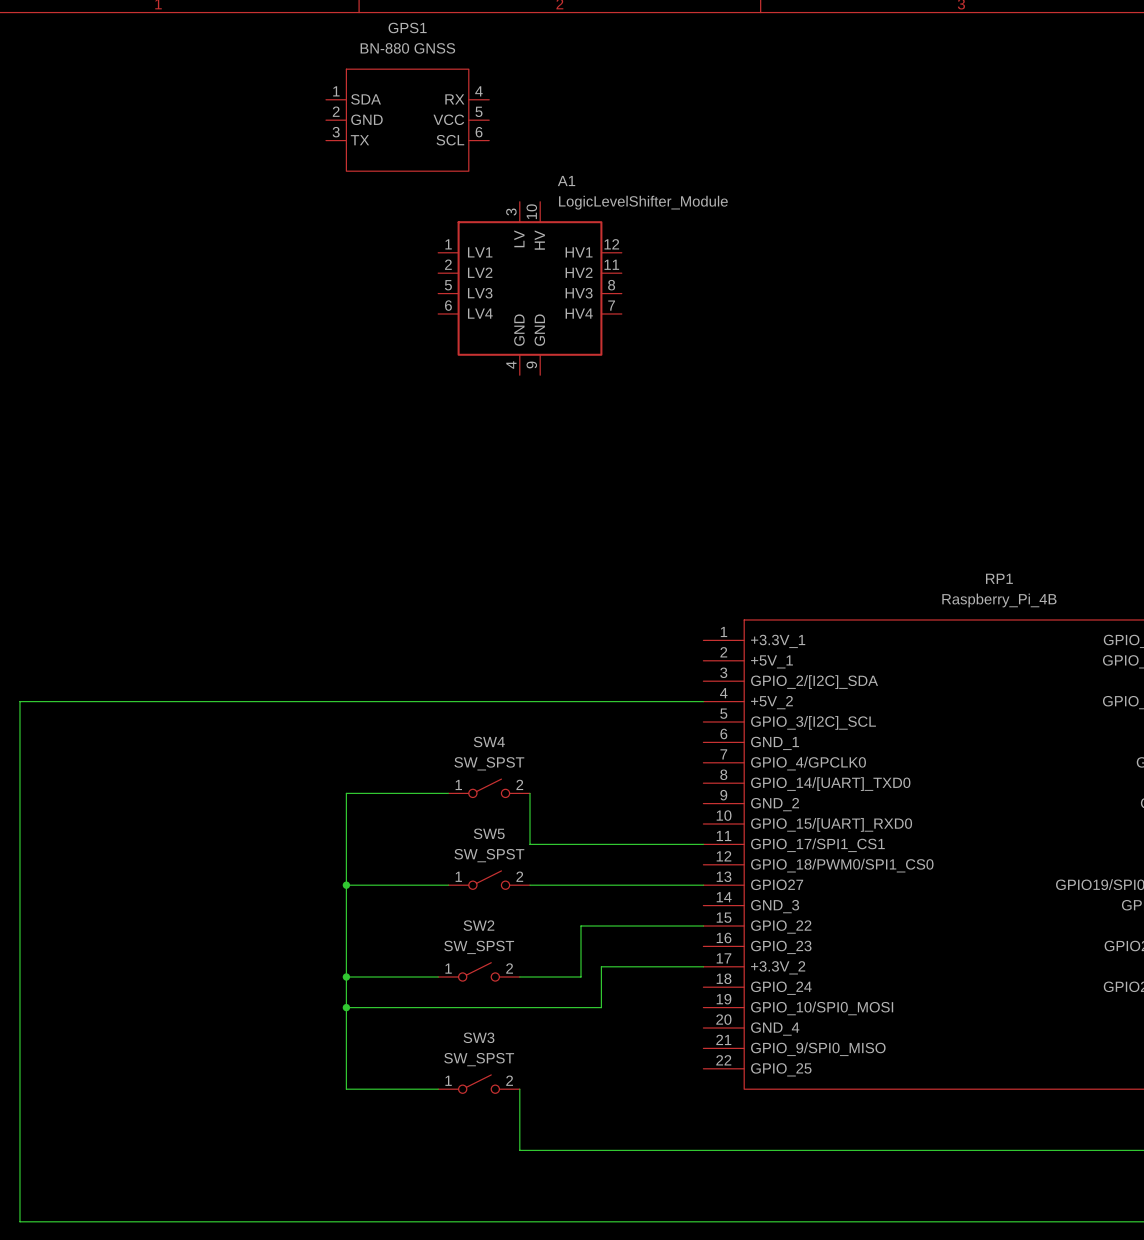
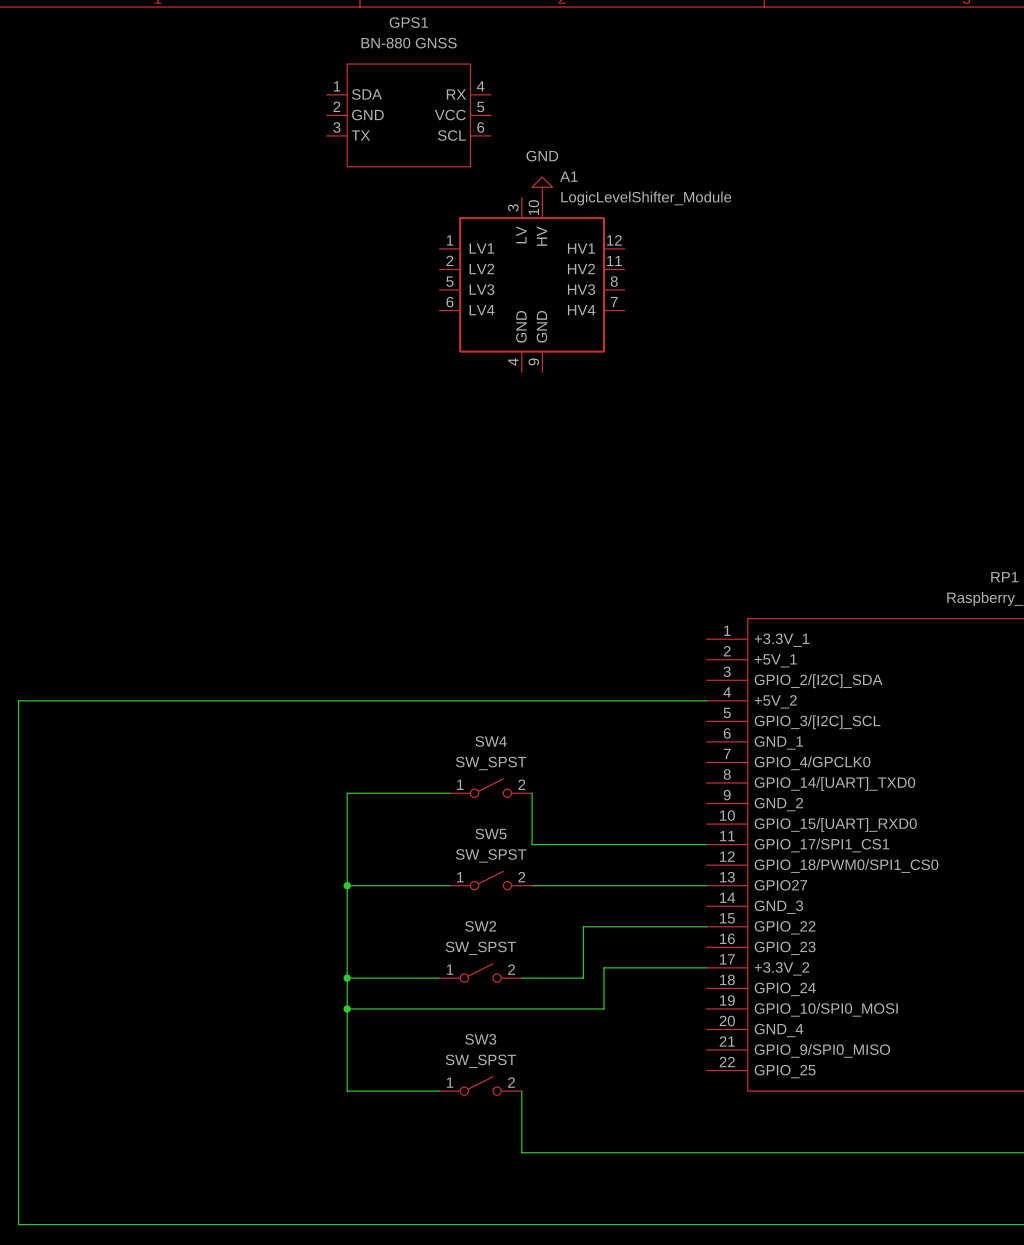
power symbol: none -> GND (542, 187)

